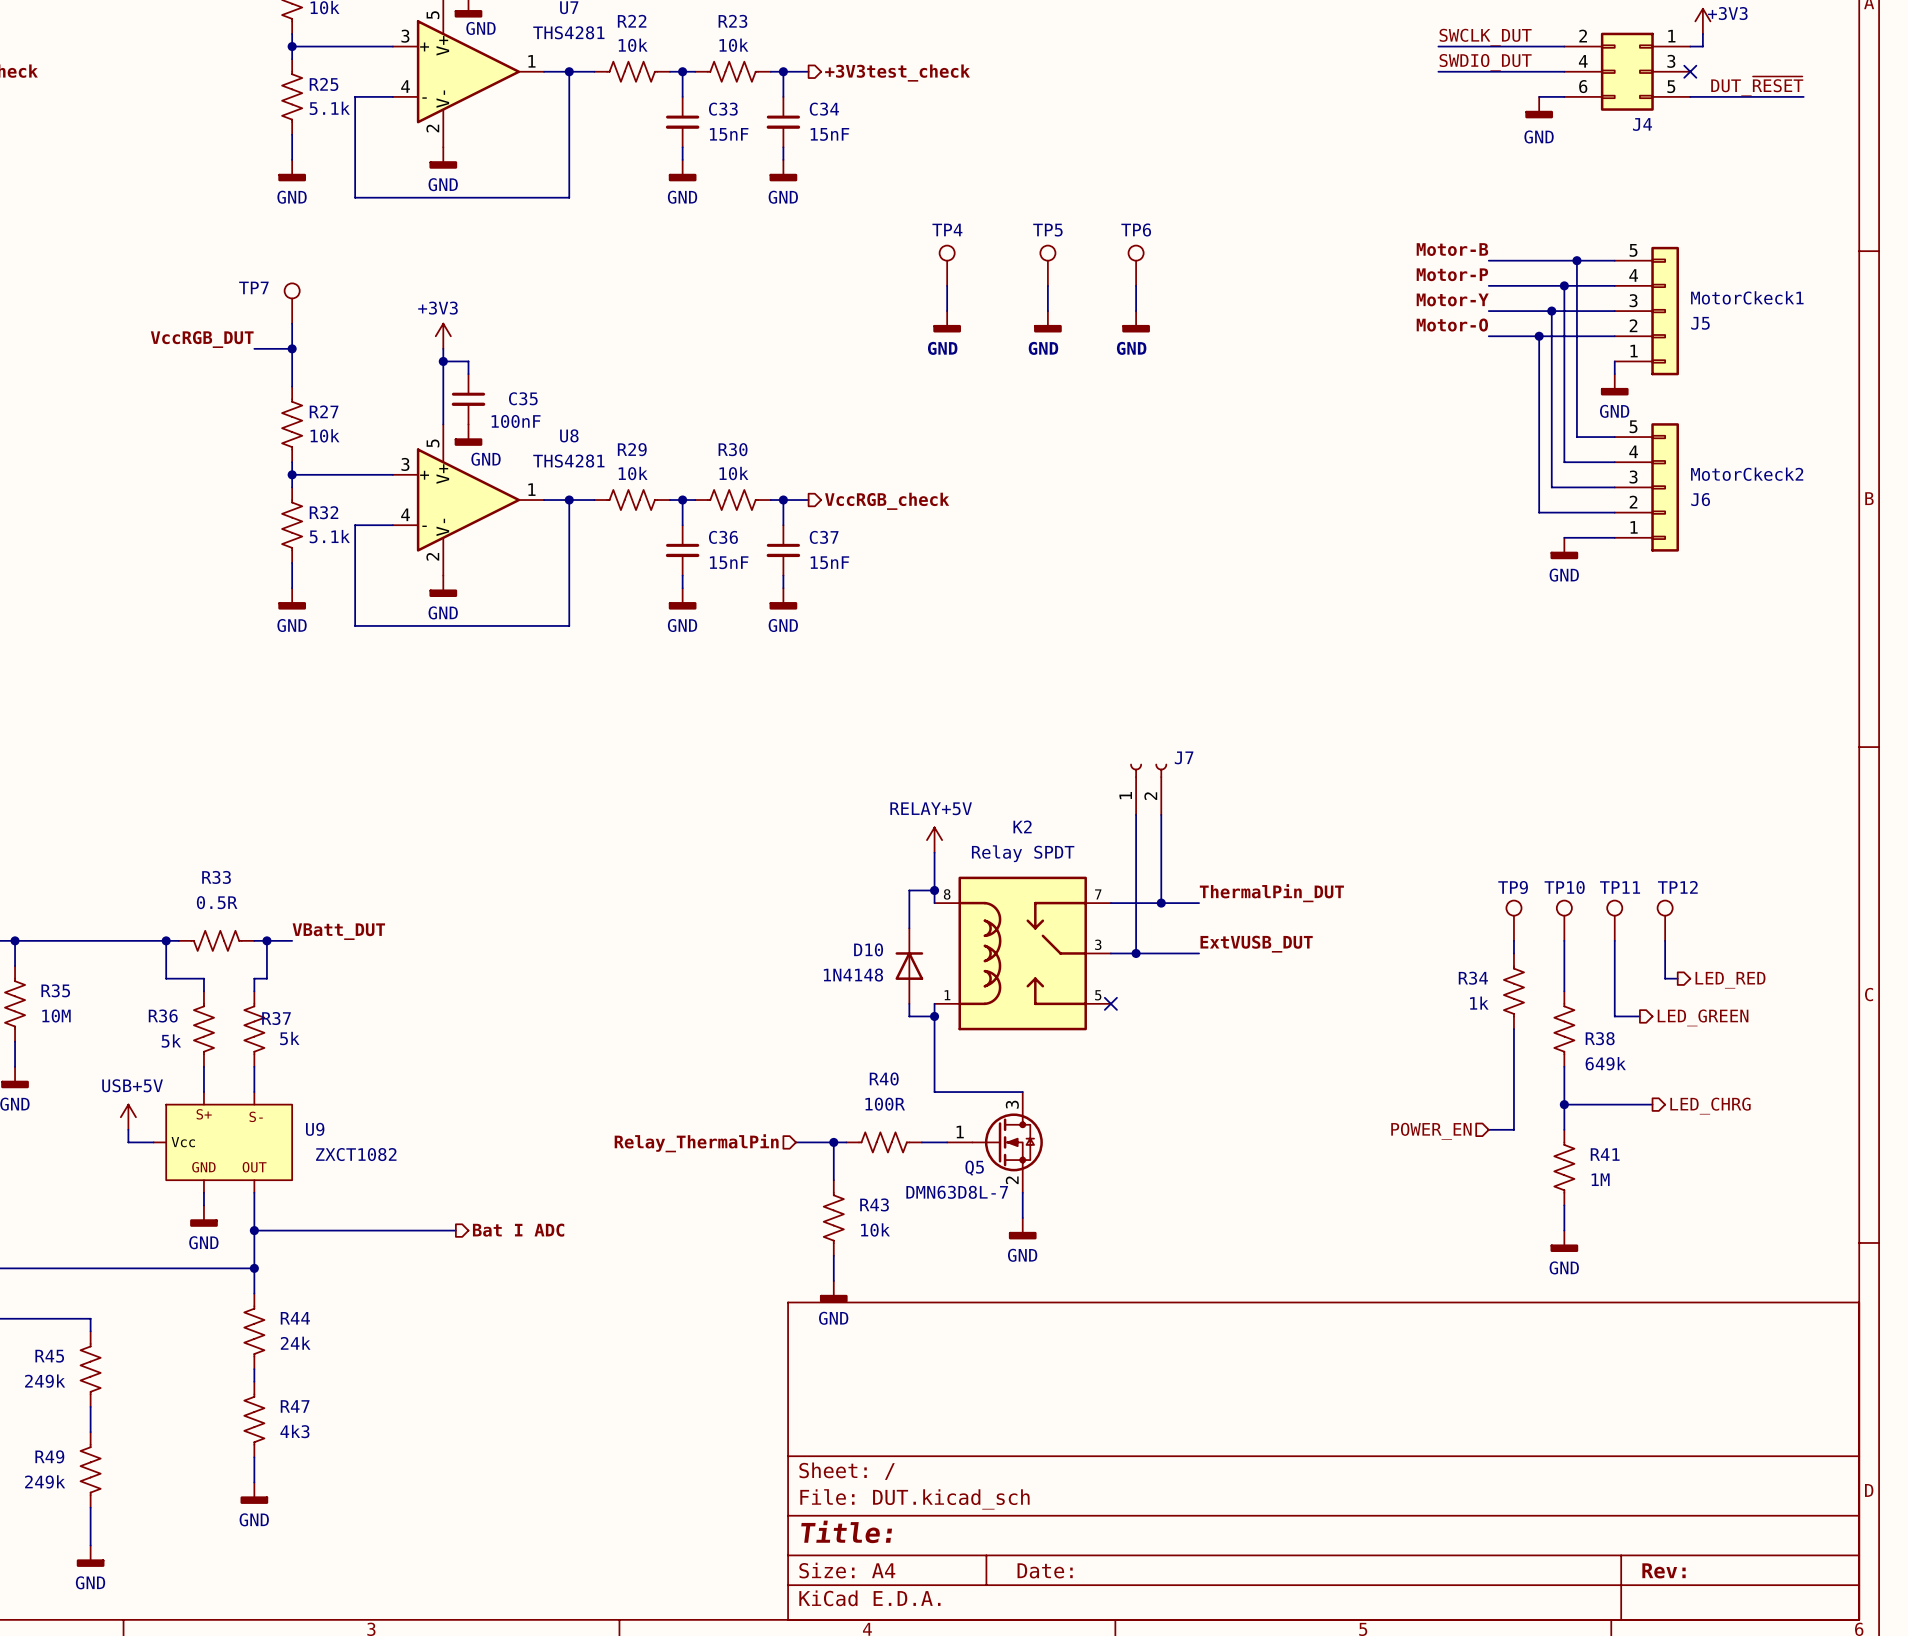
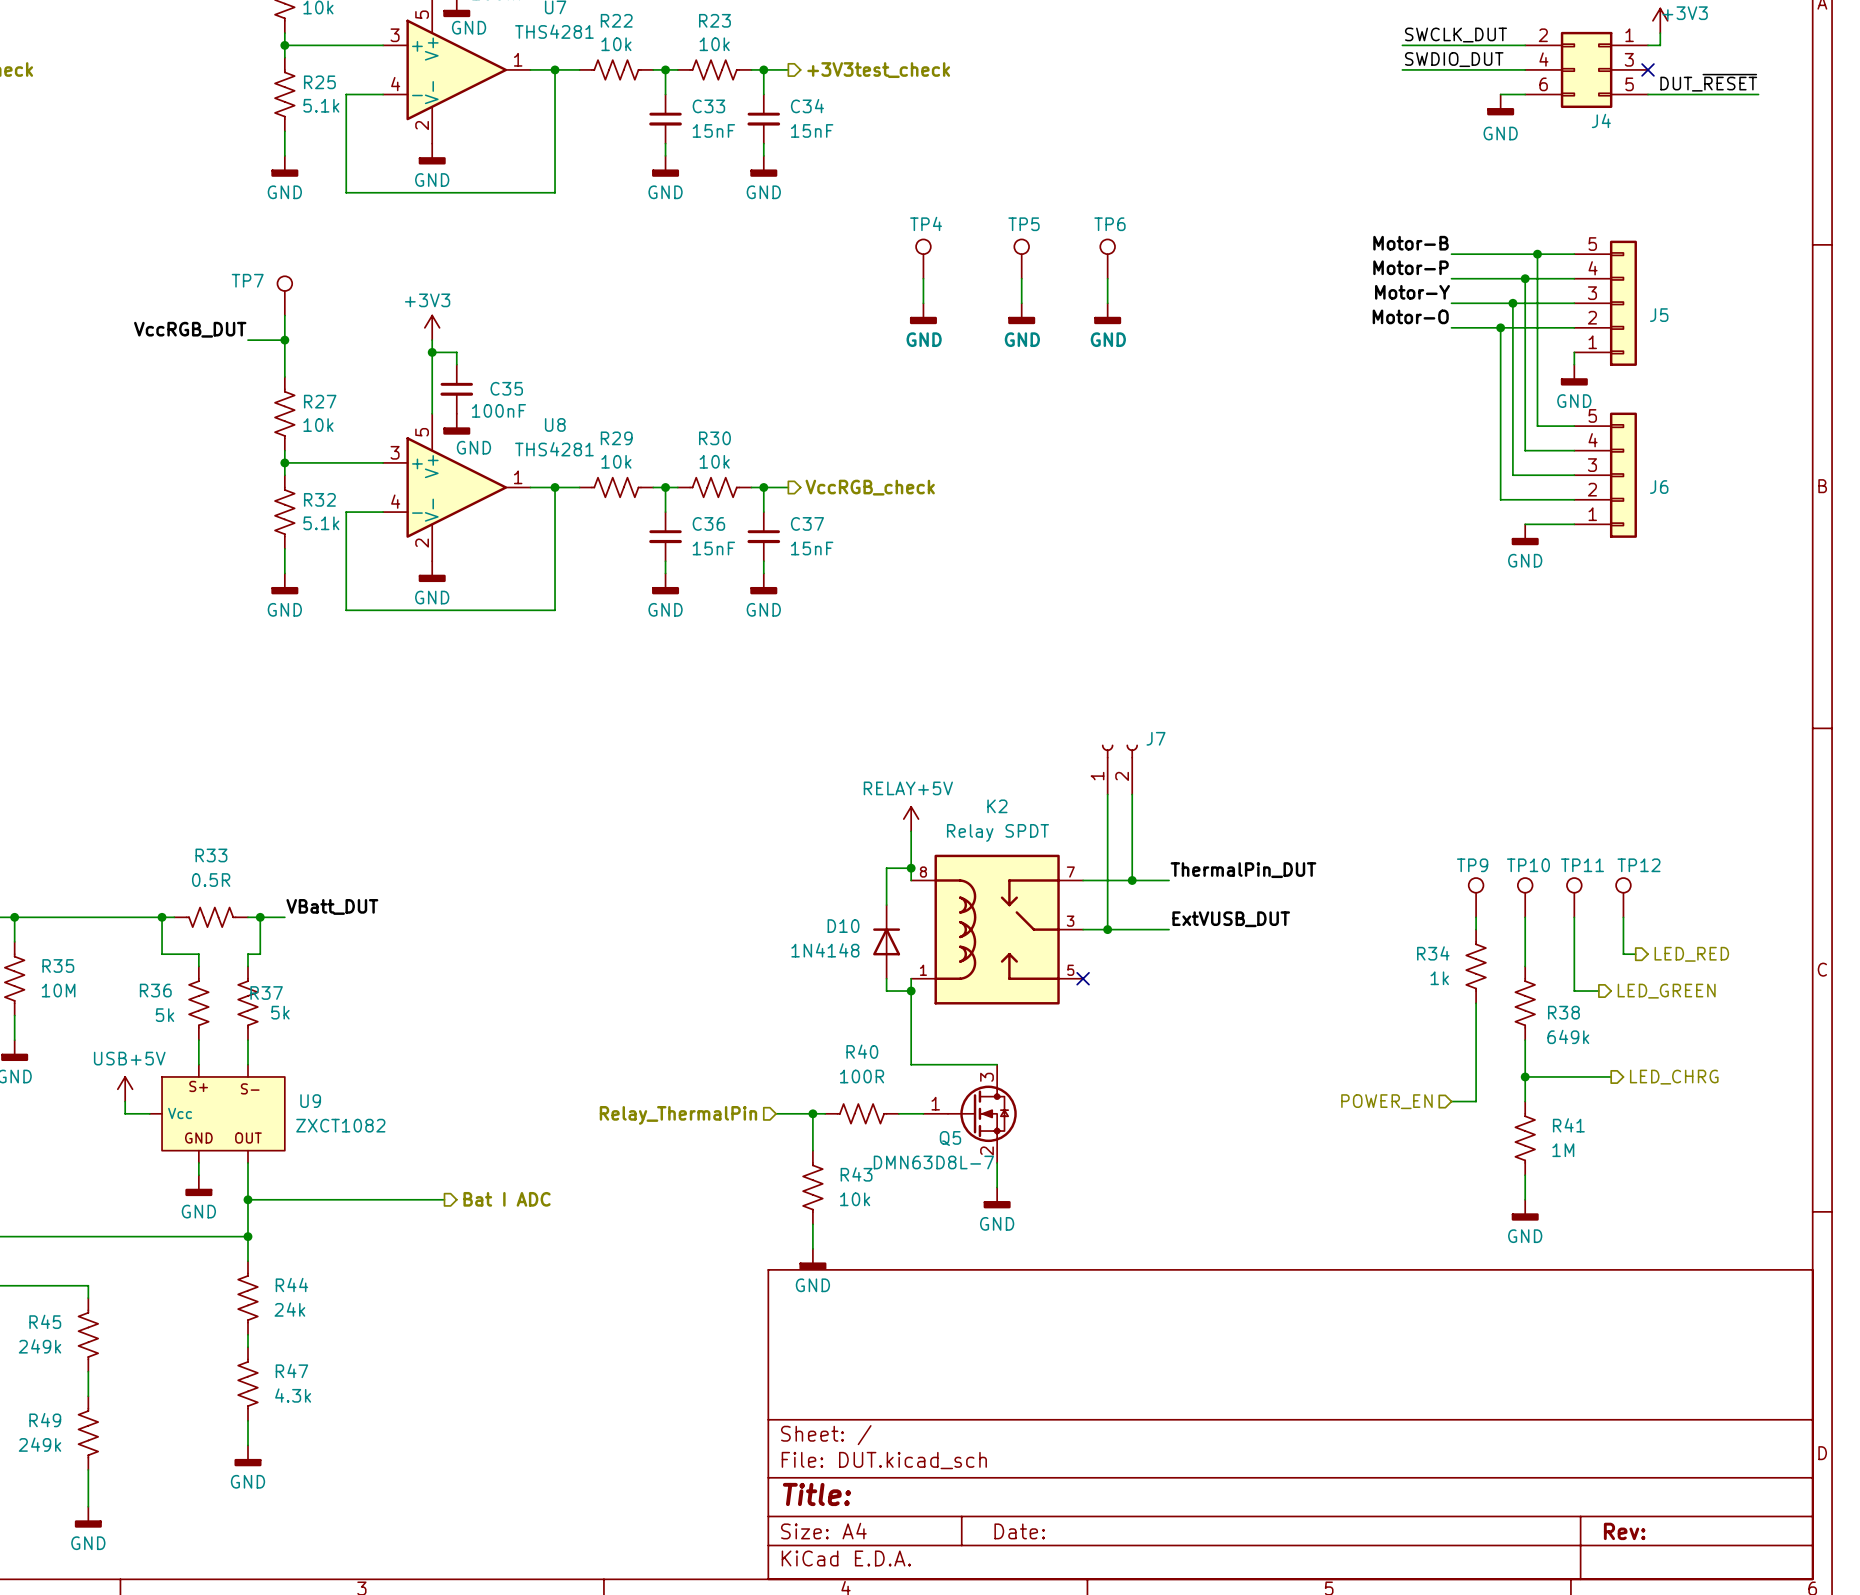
J5 value: MotorCkeck1 (1747, 297) -> none
J6 value: MotorCkeck2 (1747, 474) -> none
R47 value: 4k3 (294, 1431) -> 4.3k (293, 1395)

